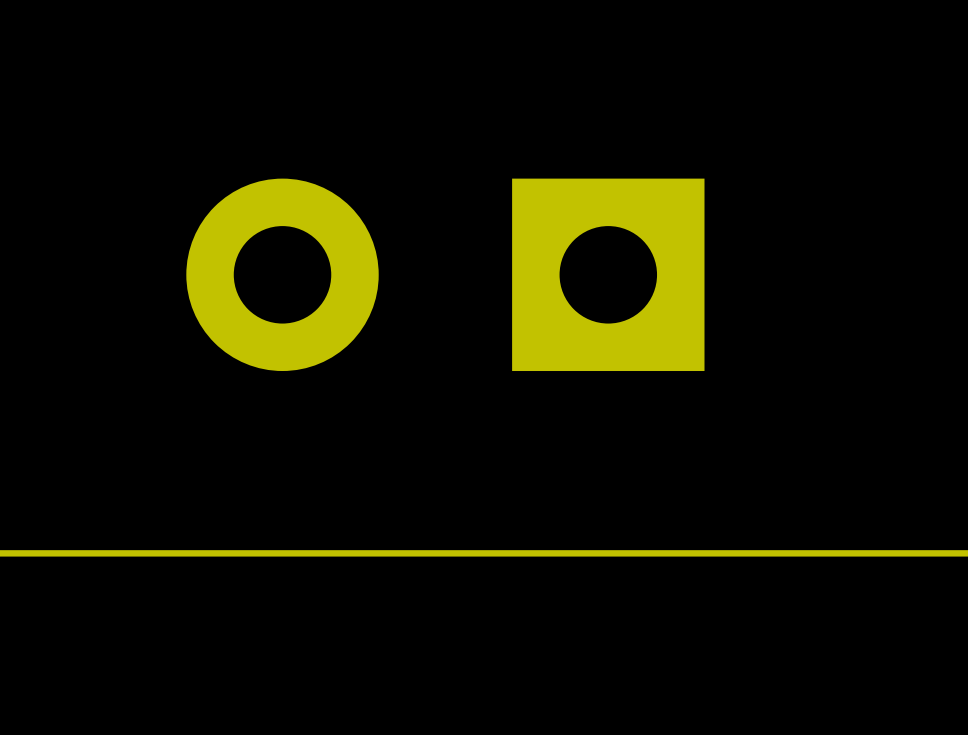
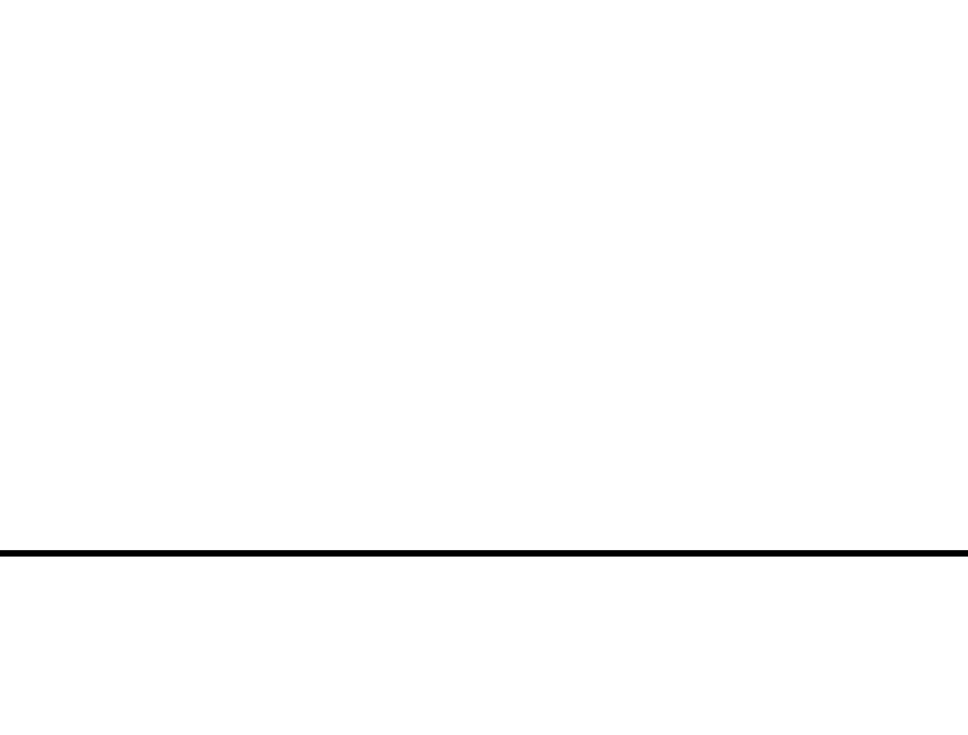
part: (445, 274) -> none

